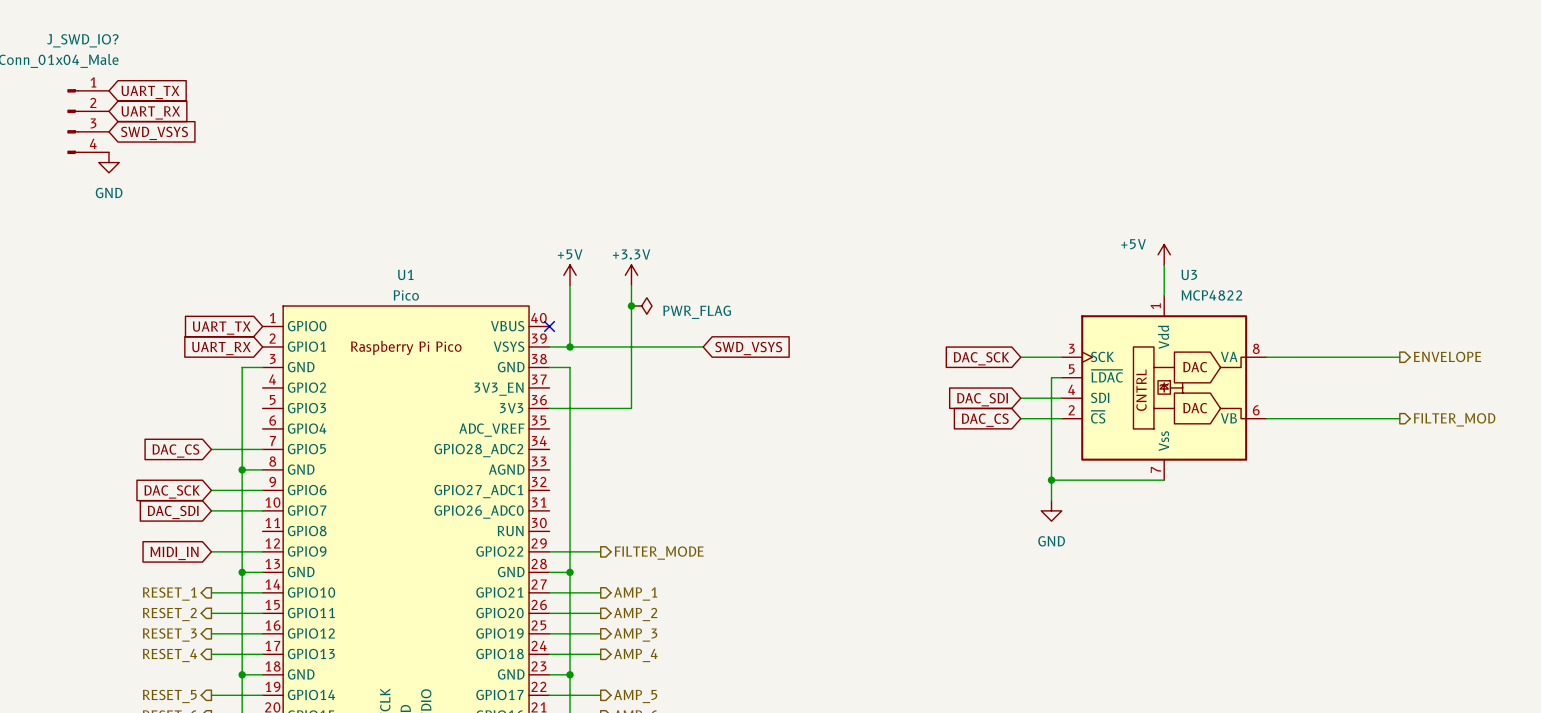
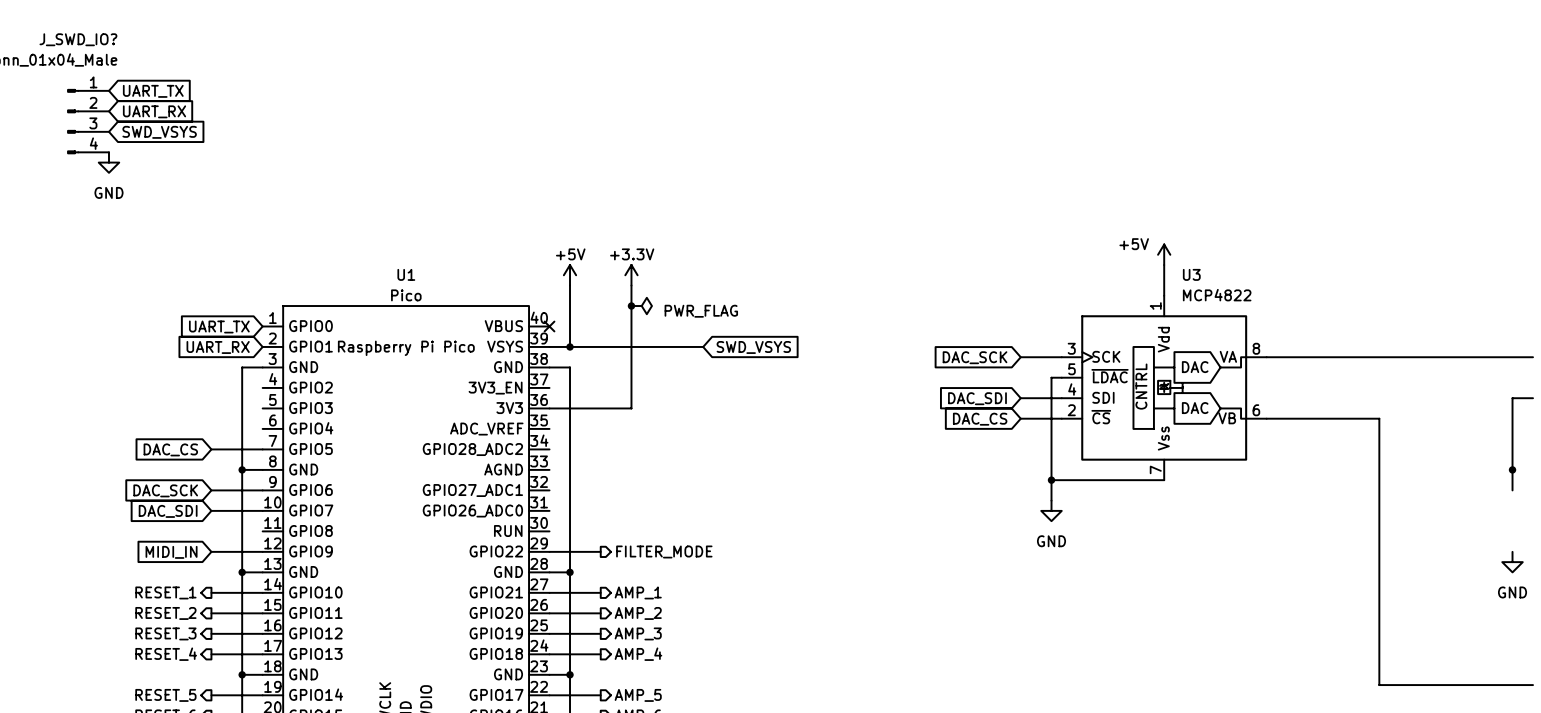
hierarchical label: ENVELOPE (1447, 356) -> none
wire: none -> (1399, 357) (1533, 357)
wire: none -> (1533, 398) (1512, 398) (1512, 490)
wire: (1379, 418) (1399, 418) -> (1379, 418) (1379, 685) (1533, 685)
hierarchical label: FILTER_MOD (1454, 419) -> none
junction: none -> (1512, 469)
power symbol: none -> GND (1512, 562)

